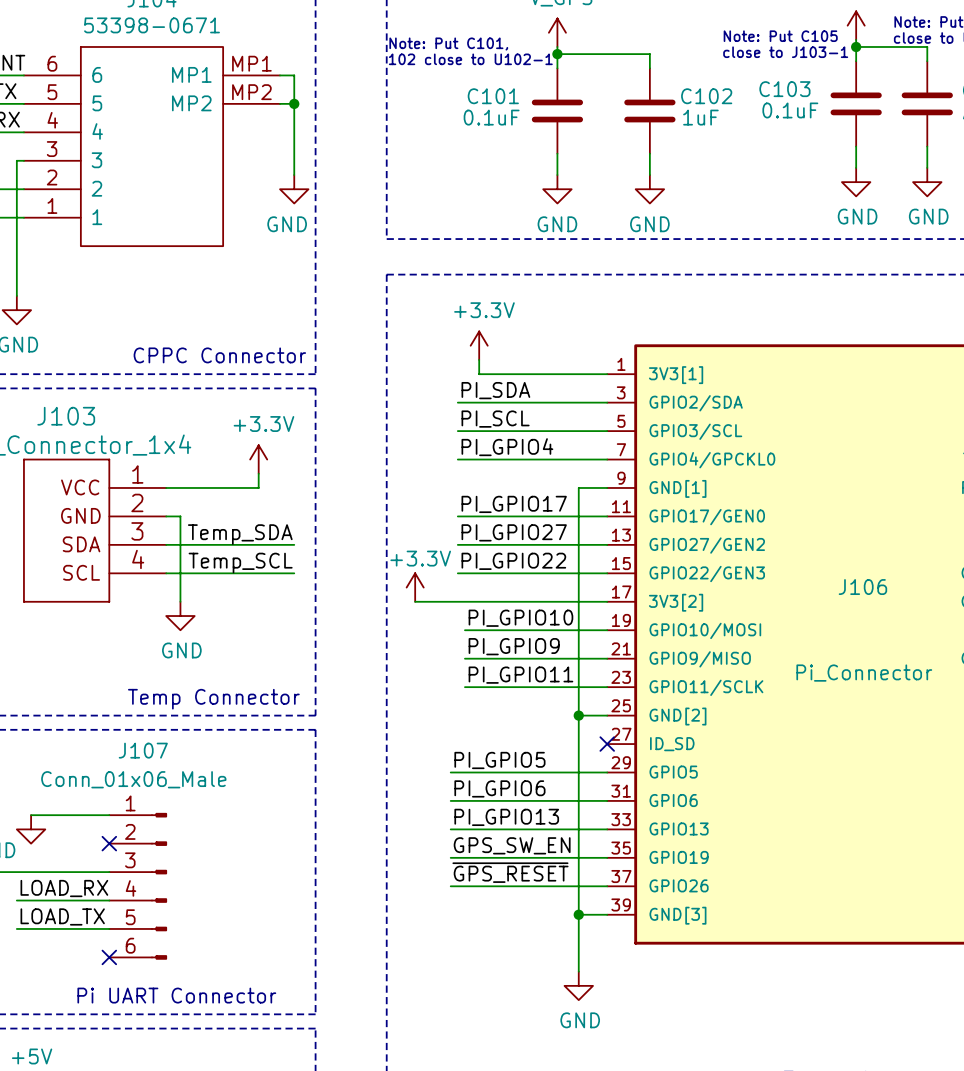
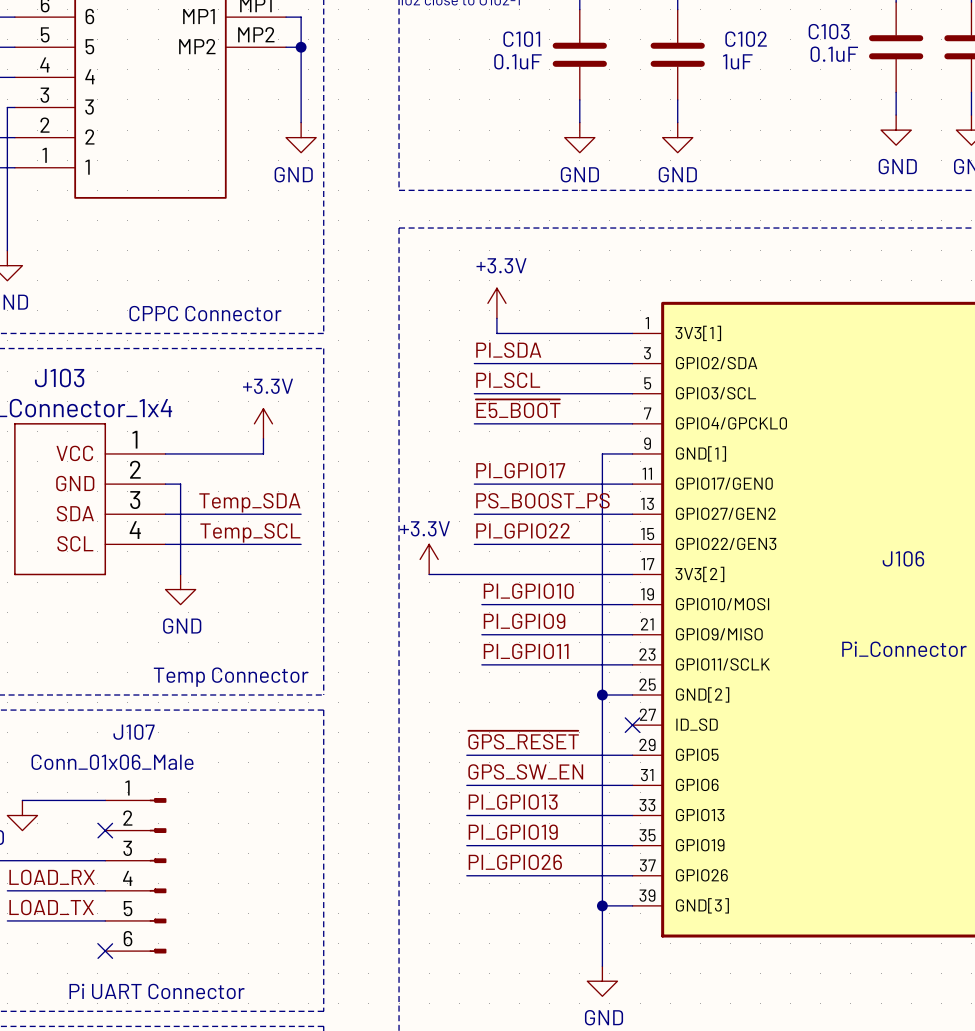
label: PI_GPIO4 (507, 447) -> ~{E5_BOOT} (518, 408)
label: PI_GPIO27 (514, 532) -> PS_BOOST_PS (542, 500)
label: PI_GPIO5 (499, 760) -> ~{GPS_RESET} (523, 740)
label: PI_GPIO6 (499, 788) -> GPS_SW_EN (525, 771)
label: GPS_SW_EN (512, 845) -> PI_GPIO19 (513, 832)
label: ~{GPS_RESET} (510, 872) -> PI_GPIO26 (515, 862)

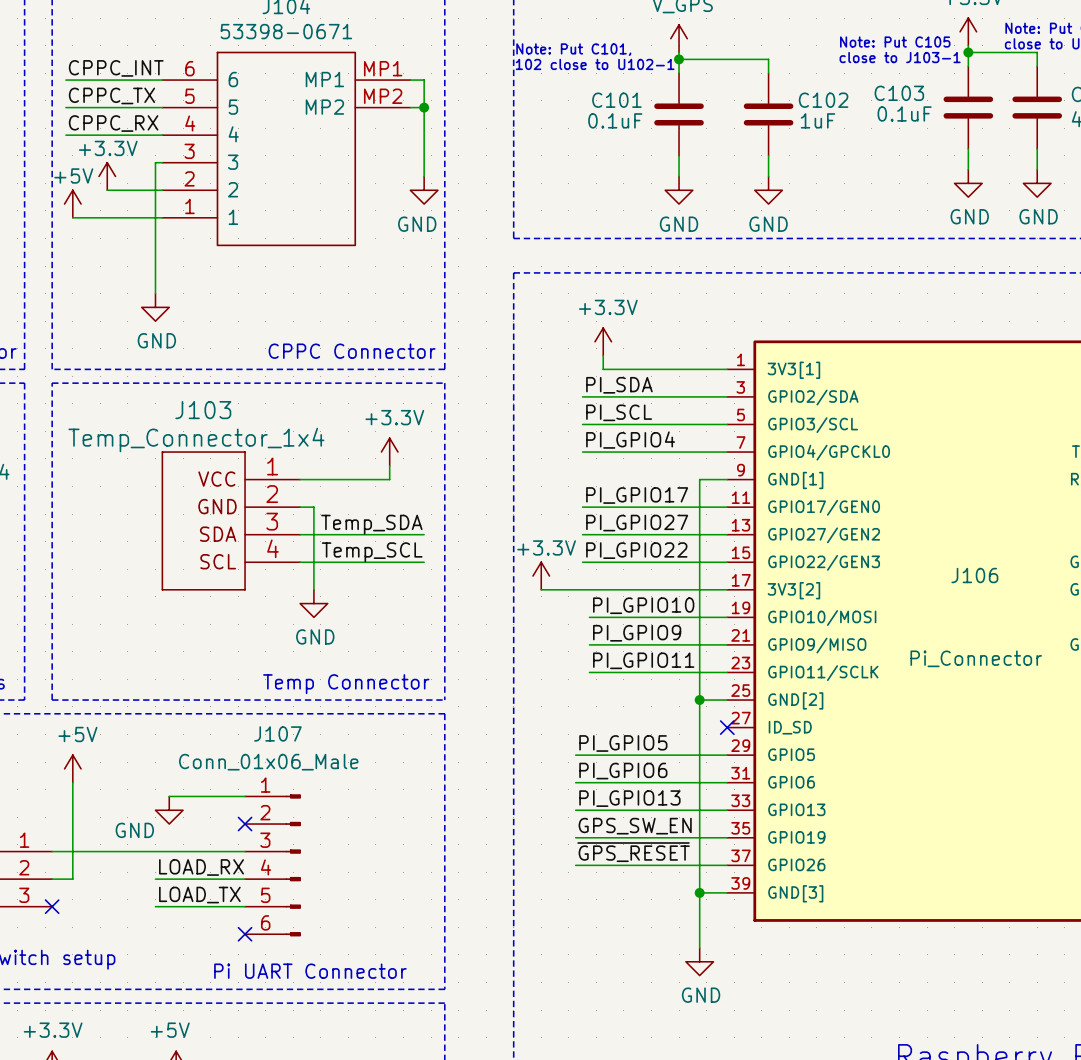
label: ~{E5_BOOT} (518, 408) -> PI_GPIO4 (630, 440)
label: PS_BOOST_PS (542, 500) -> PI_GPIO27 (637, 523)
label: ~{GPS_RESET} (523, 740) -> PI_GPIO5 (623, 743)
label: GPS_SW_EN (525, 771) -> PI_GPIO6 (623, 771)
label: PI_GPIO19 (513, 832) -> GPS_SW_EN (635, 826)
label: PI_GPIO26 (515, 862) -> ~{GPS_RESET} (633, 852)

